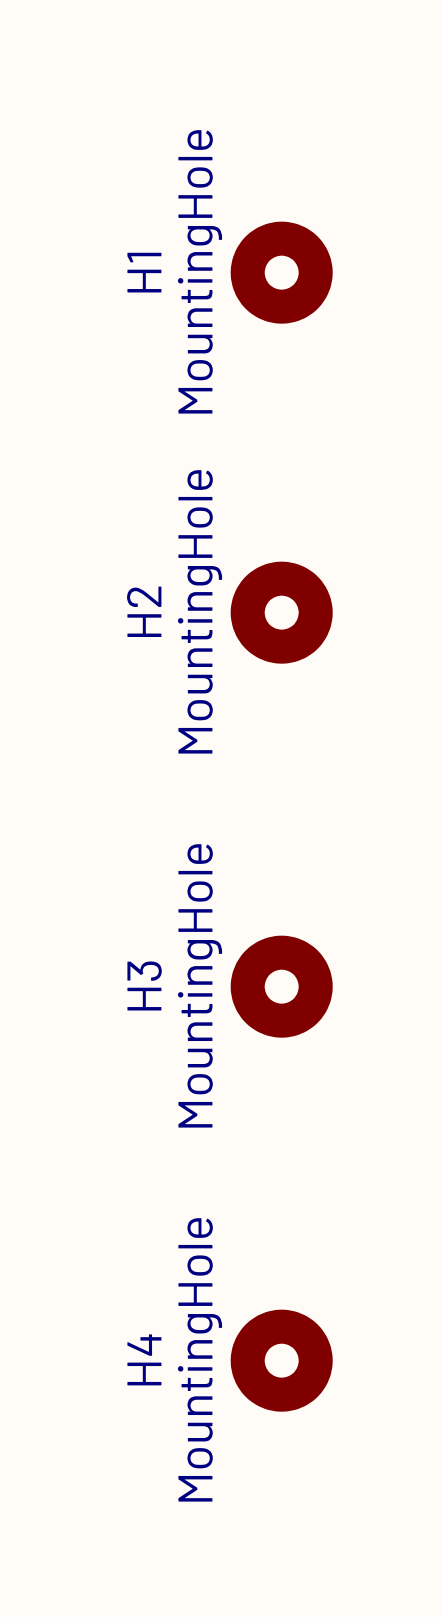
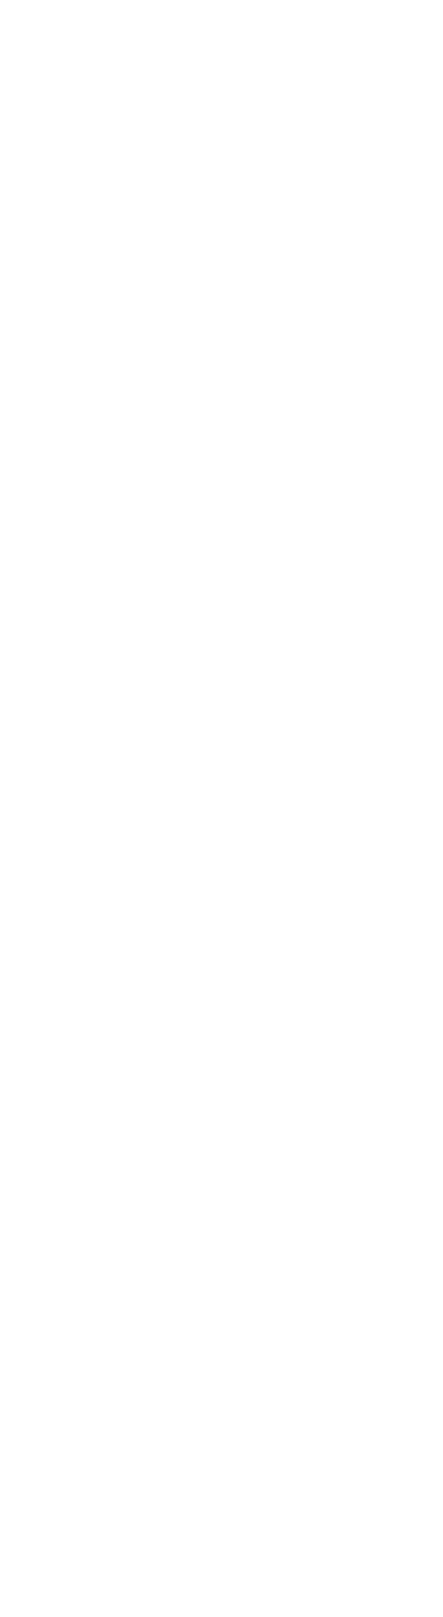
H1: MountingHole (281, 272) -> none
H2: MountingHole (281, 612) -> none
H3: MountingHole (281, 986) -> none
H4: MountingHole (281, 1360) -> none

